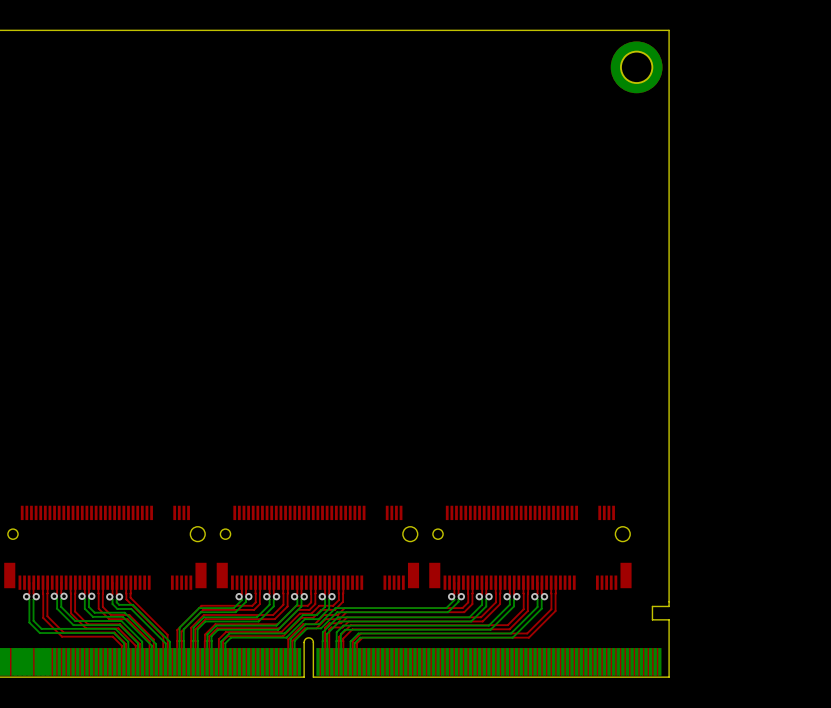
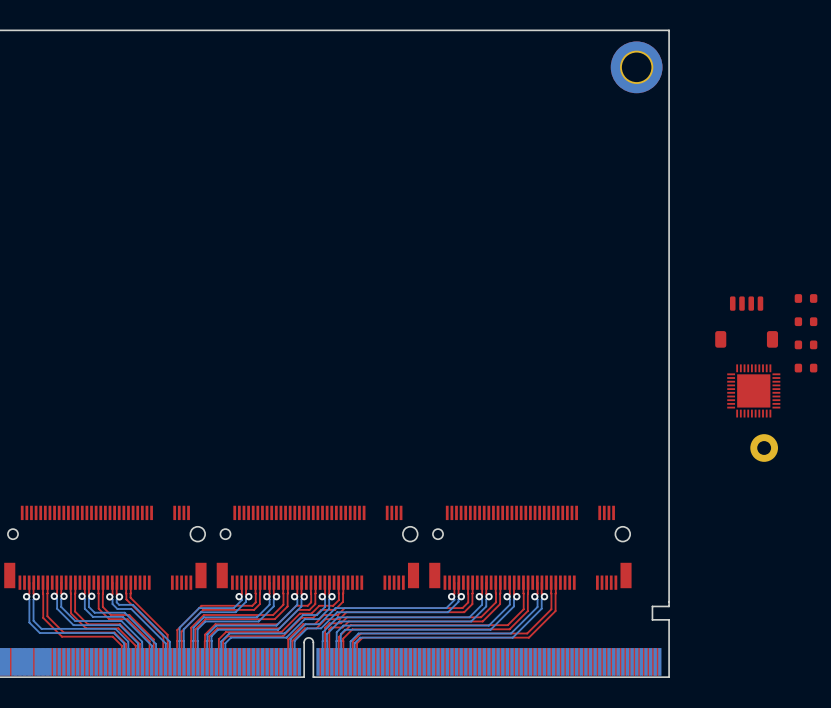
part: none -> (806, 298)
part: none -> (806, 321)
part: none -> (746, 322)
part: none -> (806, 344)
part: none -> (806, 368)
part: none -> (753, 390)
part: none -> (764, 448)

